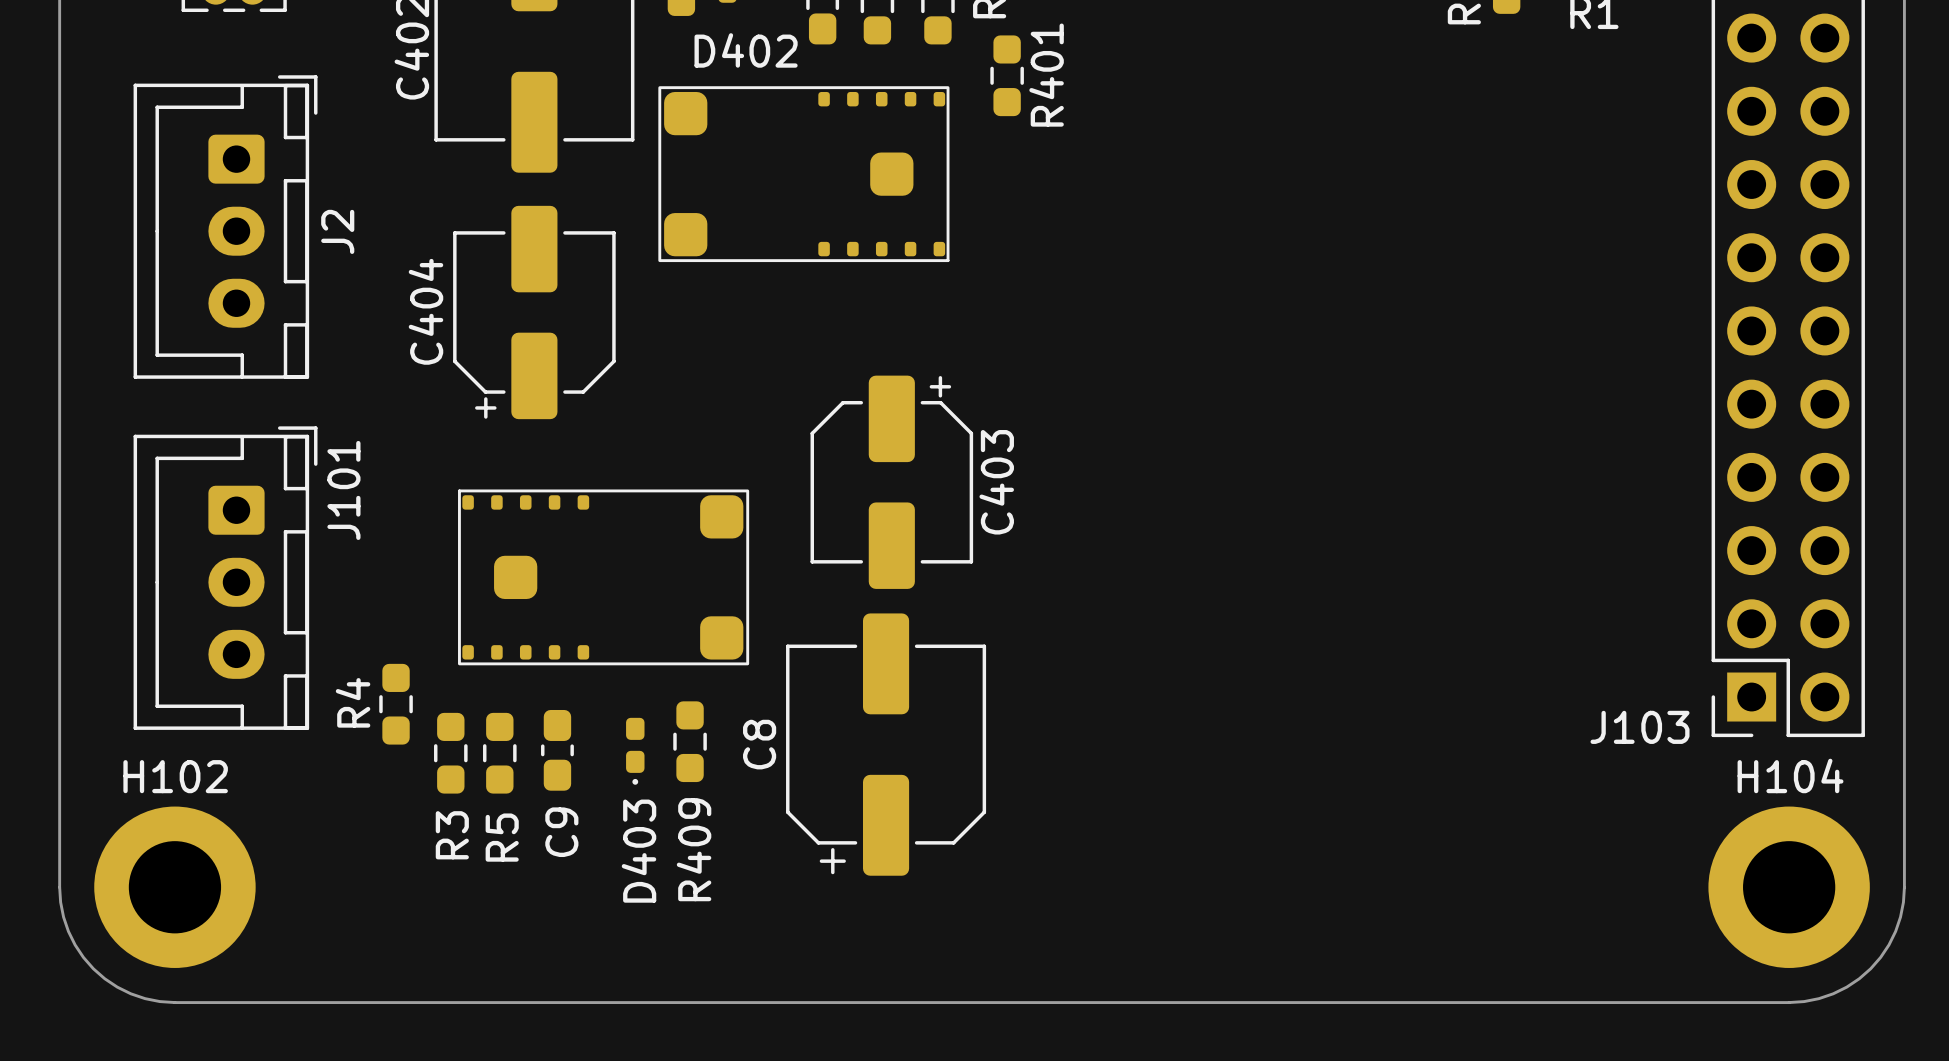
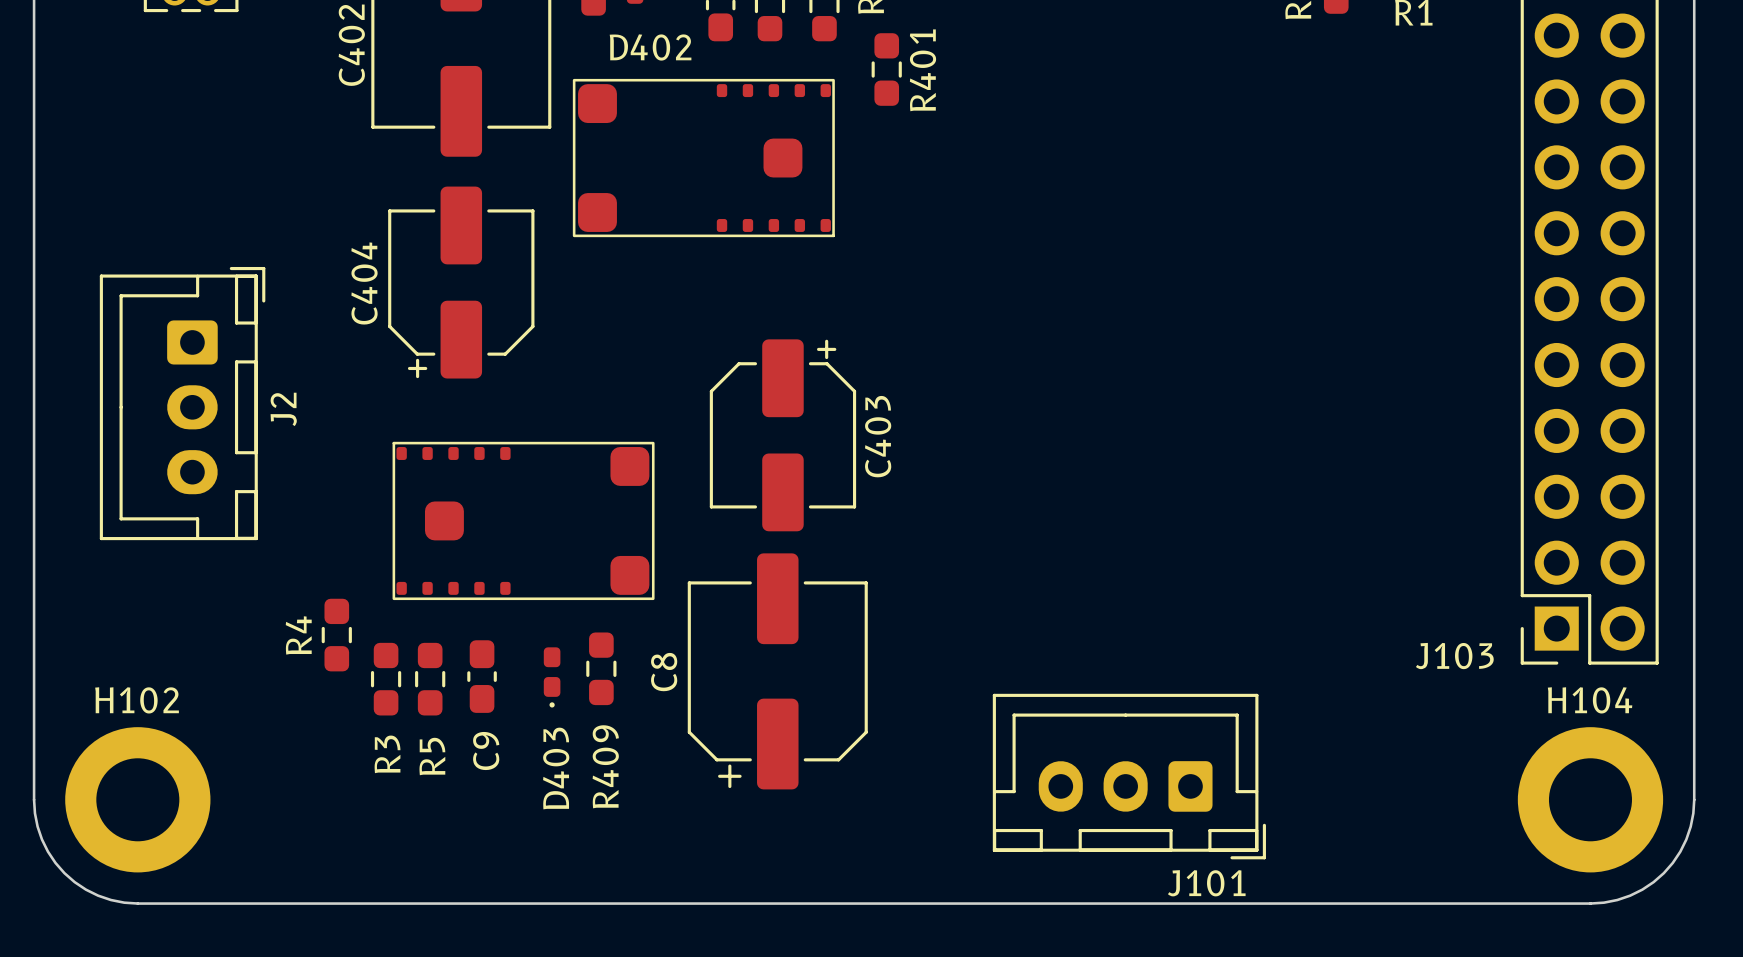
J2 position: (225, 227) -> (182, 403)
J101 rotation: 0° (225, 578) -> 90° clockwise (1129, 776)
J101 position: (225, 578) -> (1129, 776)

